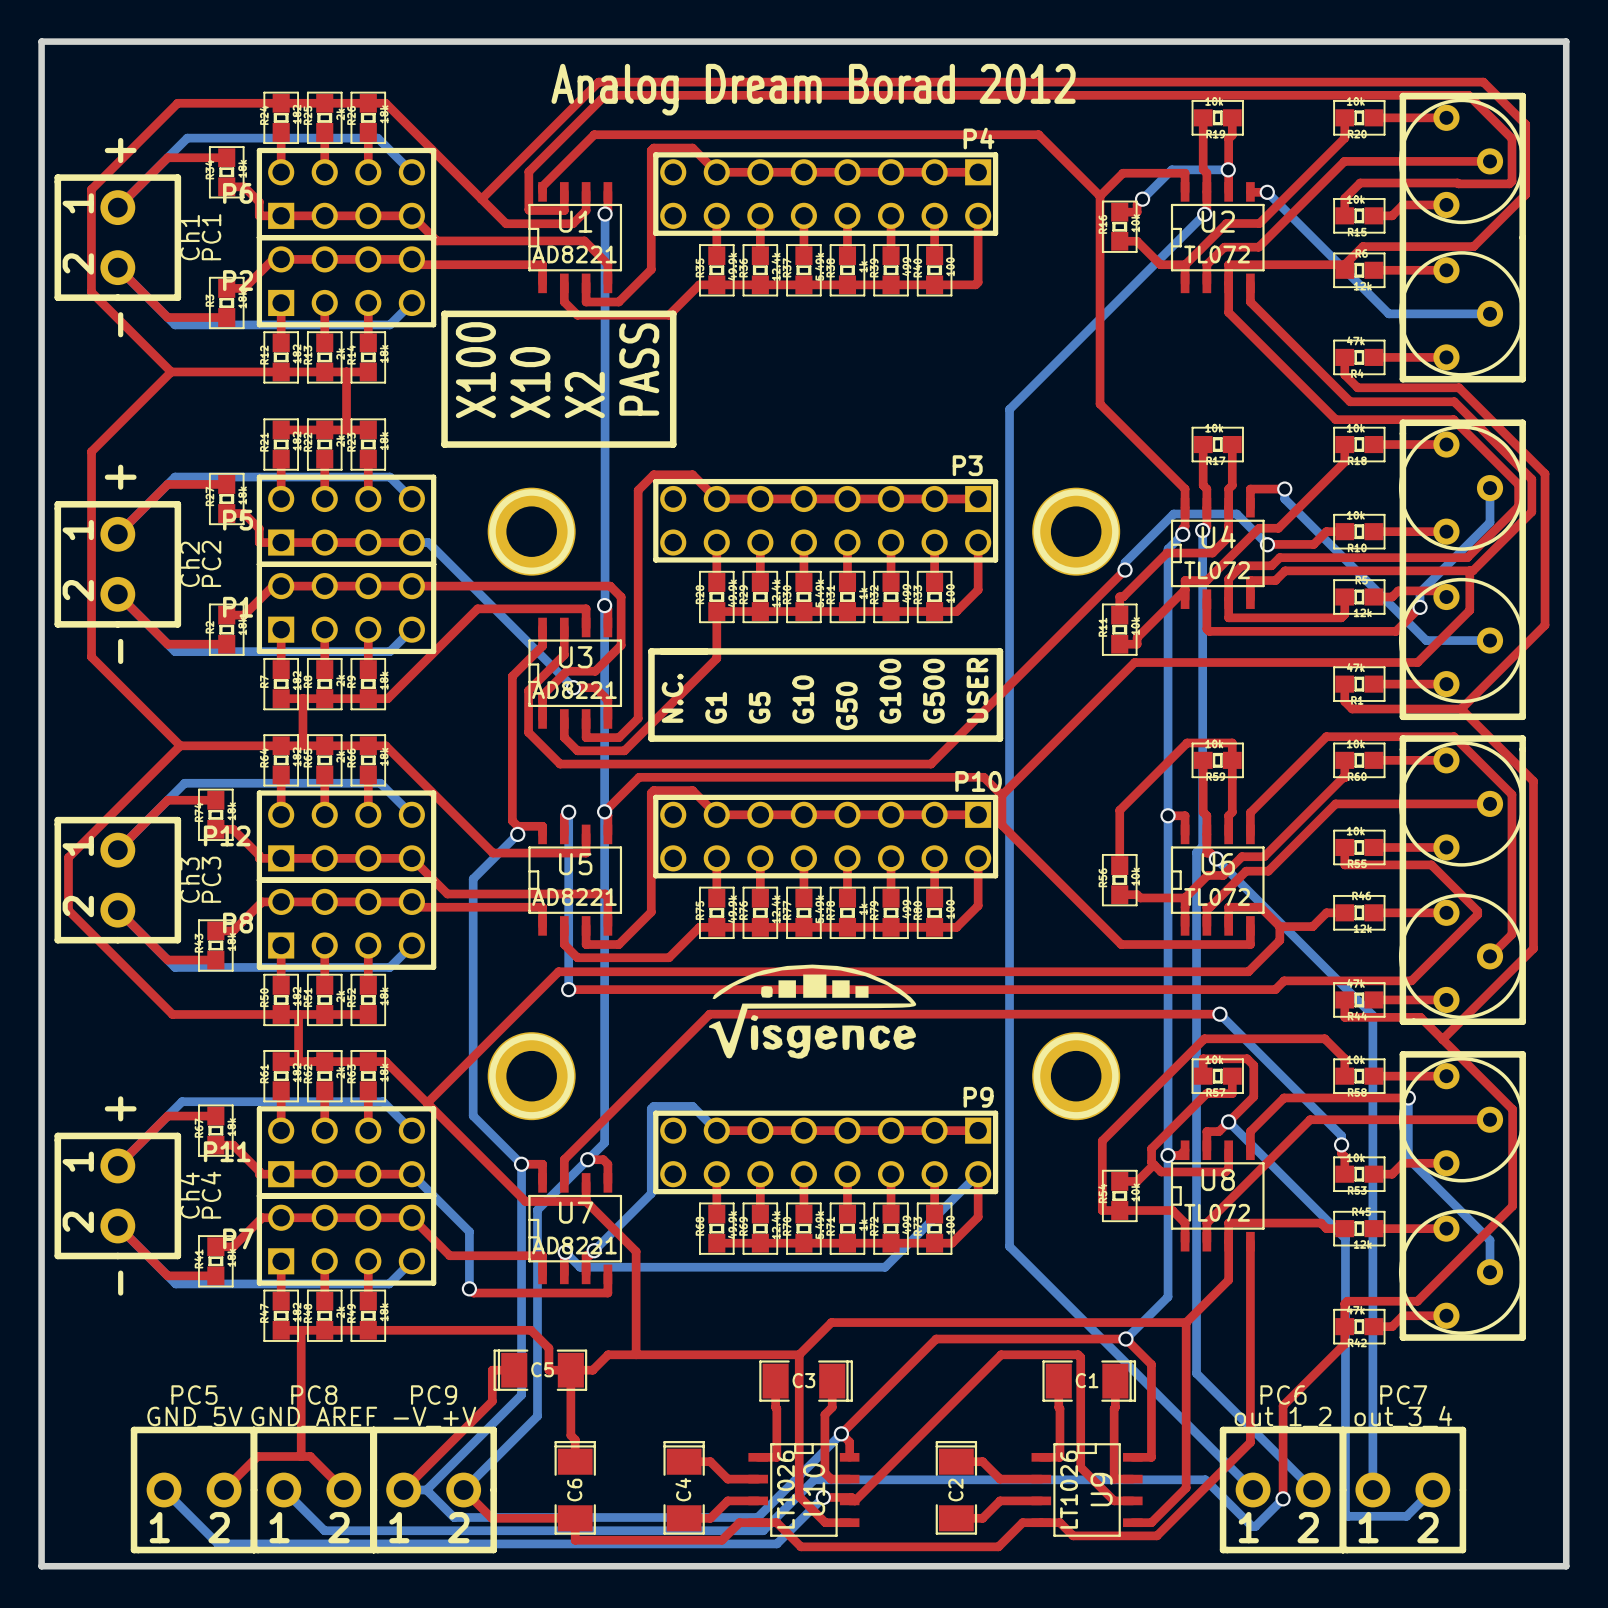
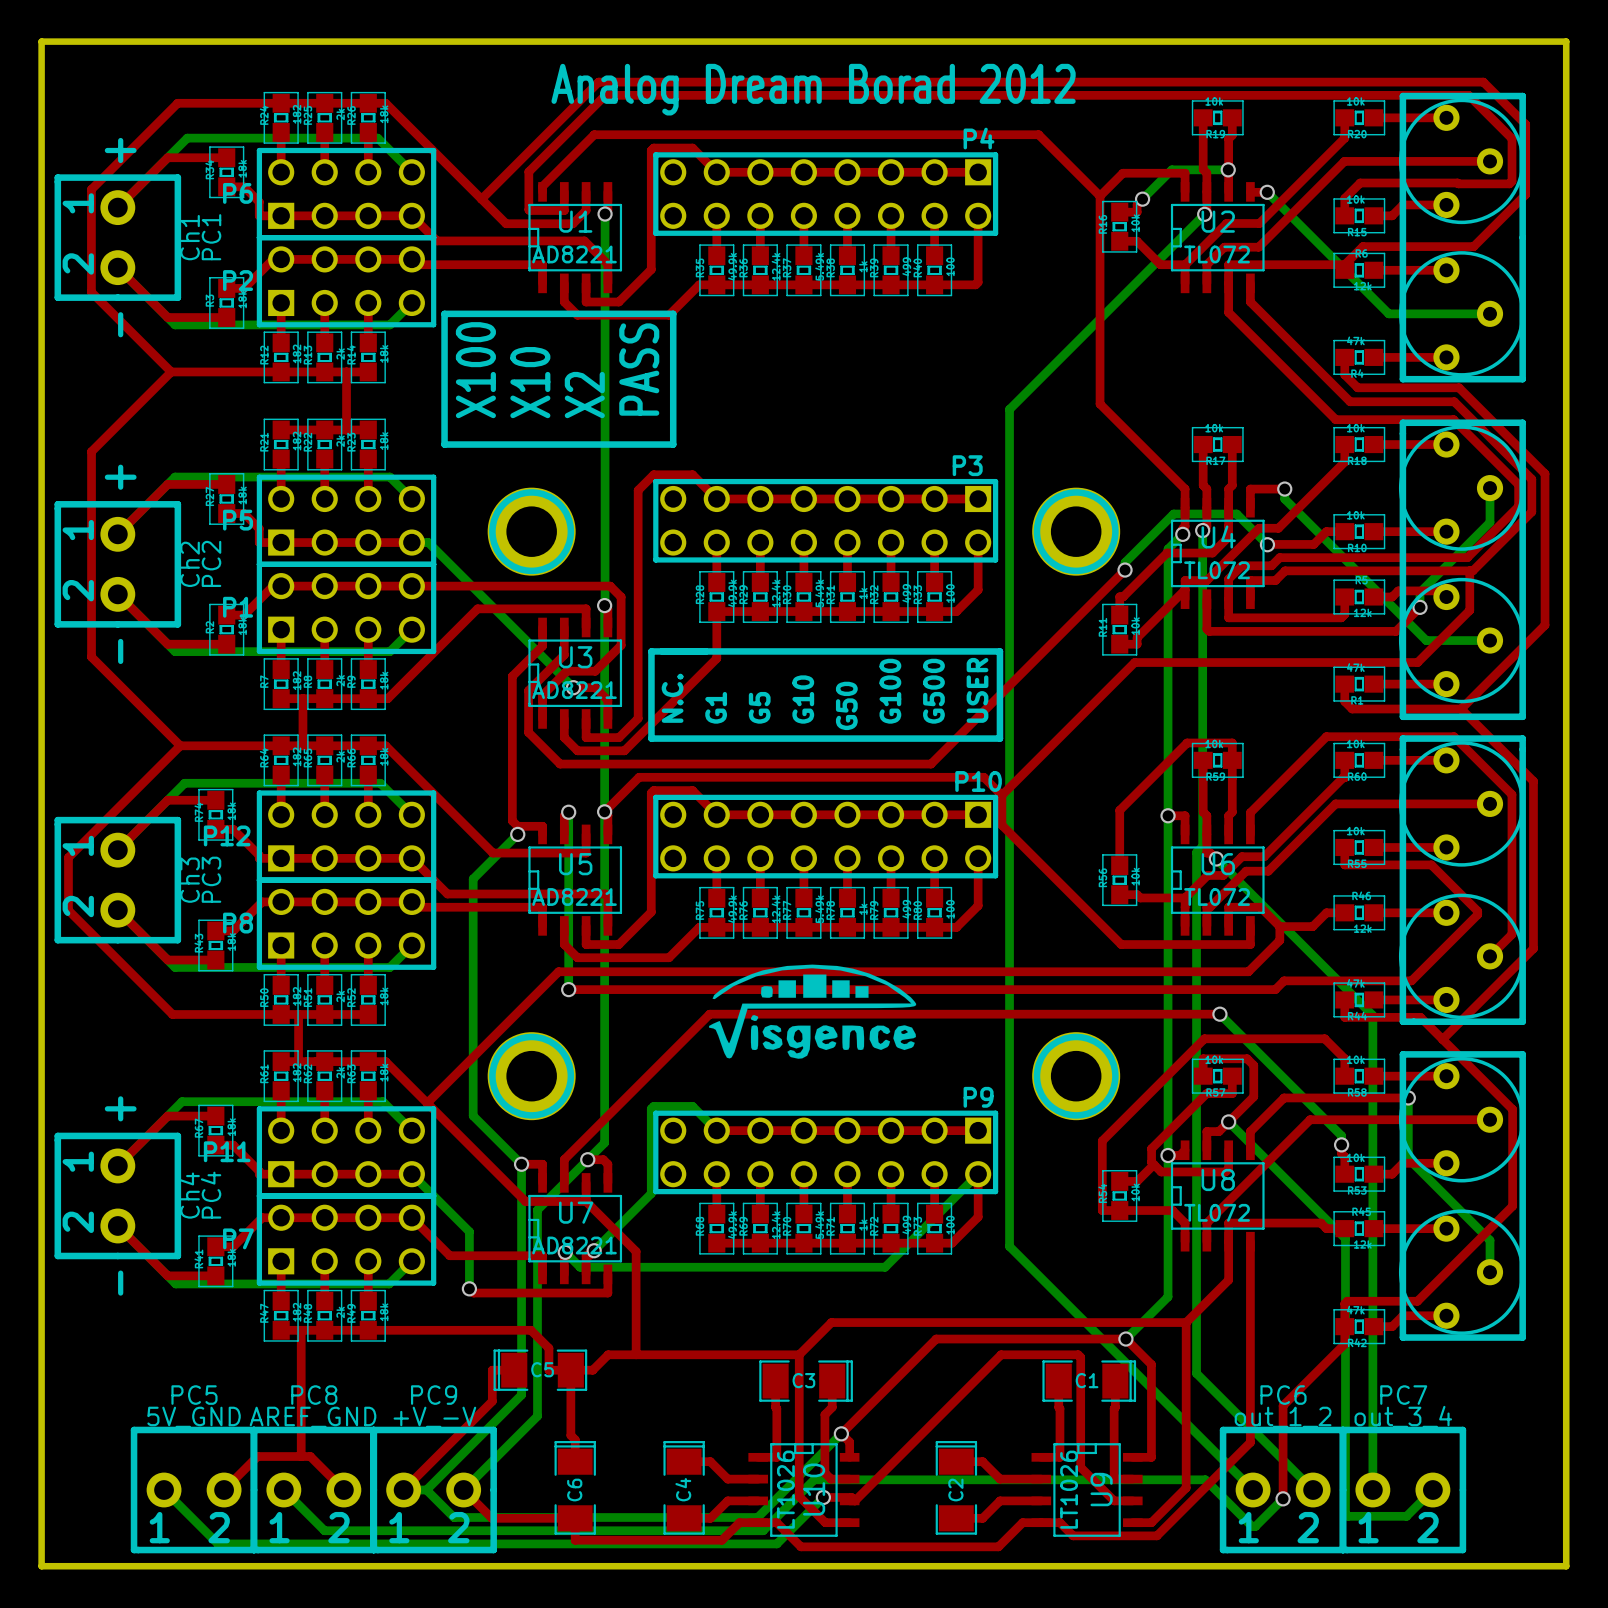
PC5 value: GND_5V (194, 1417) -> 5V_GND (194, 1417)
PC8 value: GND_AREF (314, 1417) -> AREF_GND (313, 1417)
PC9 value: -V_+V (434, 1417) -> +V_-V (434, 1417)

